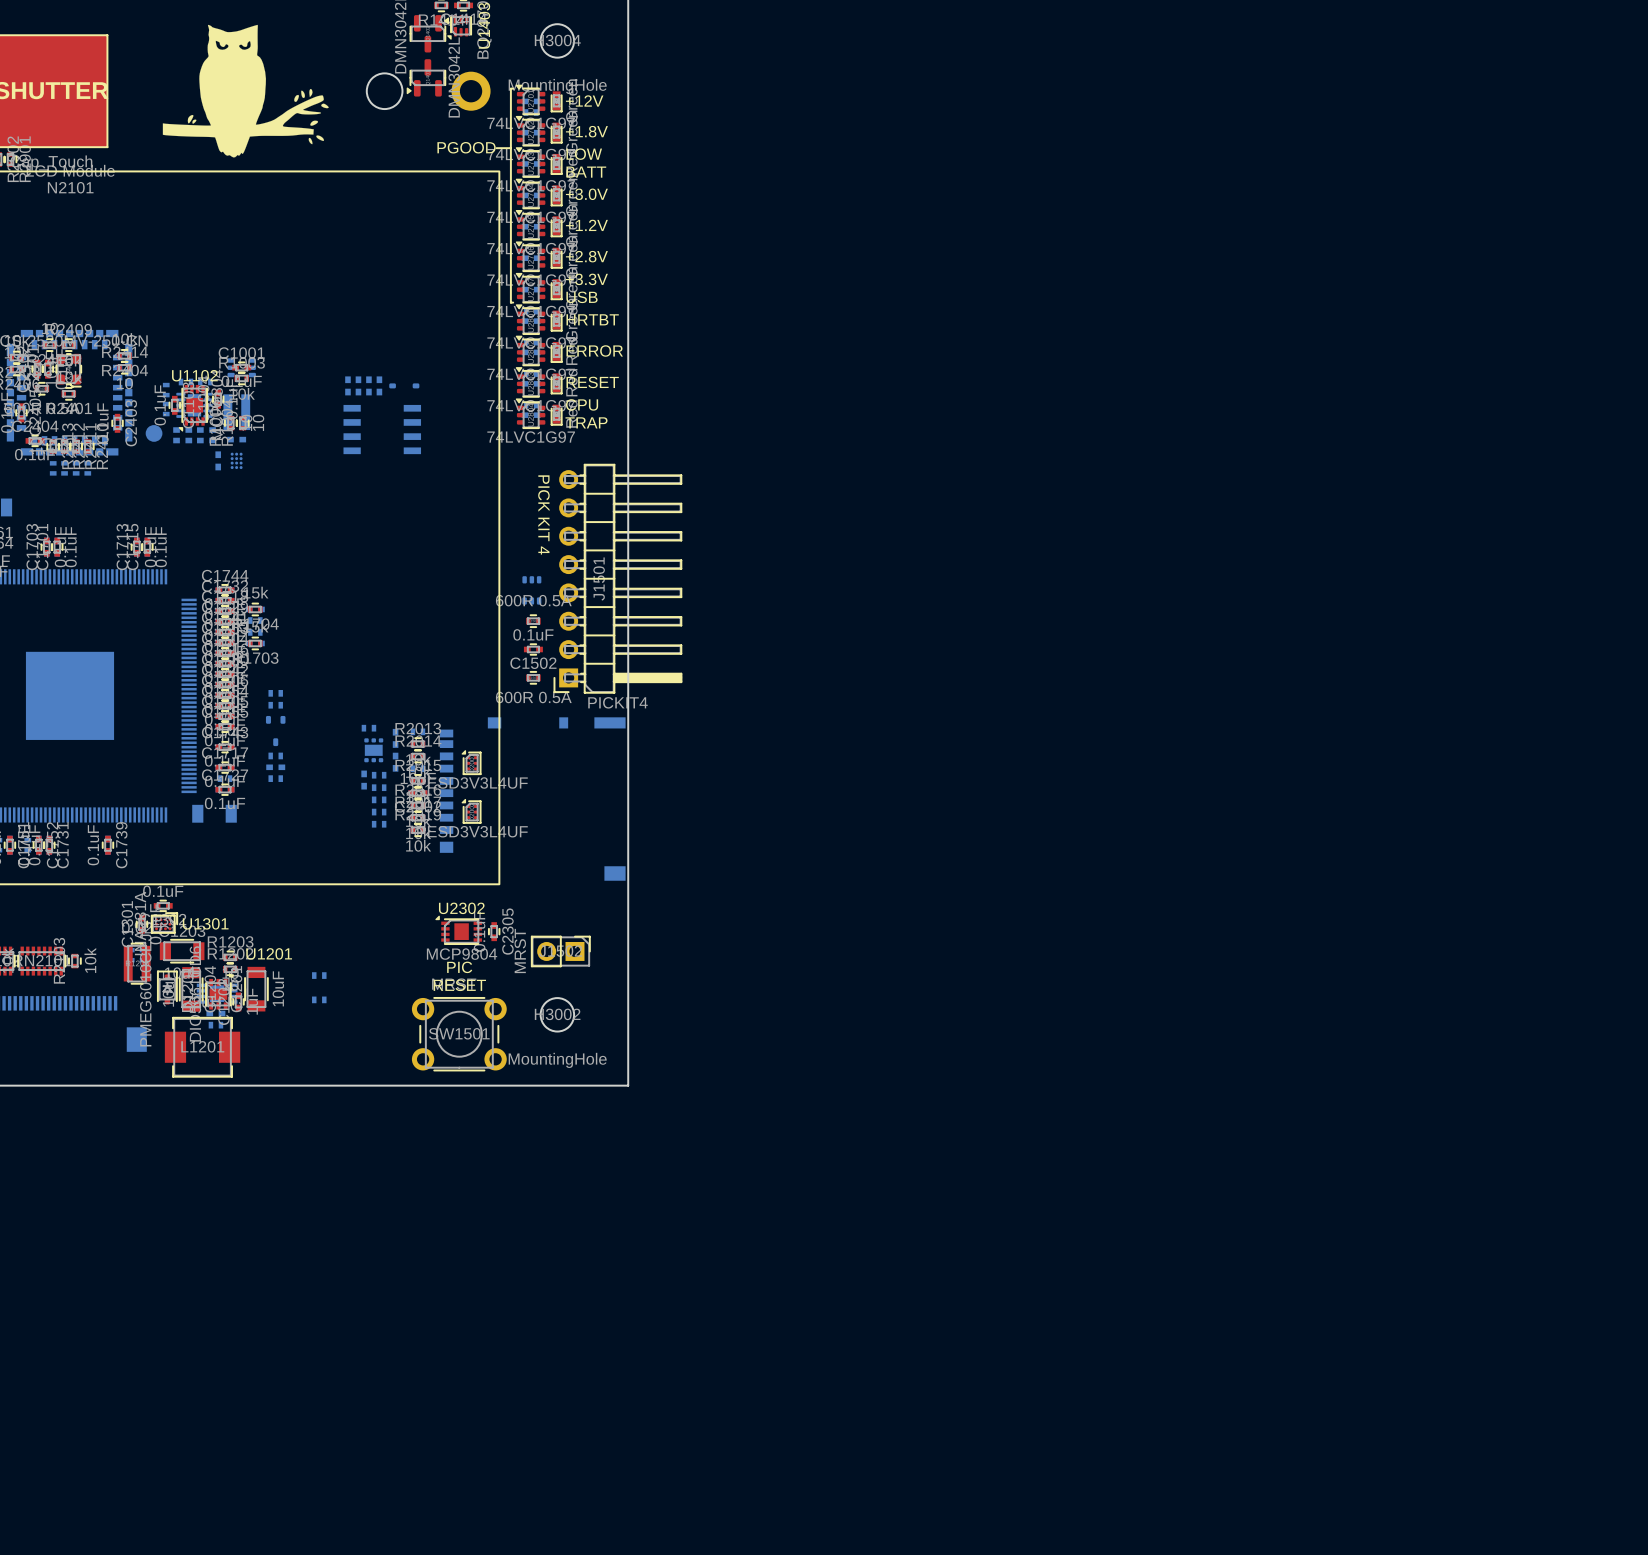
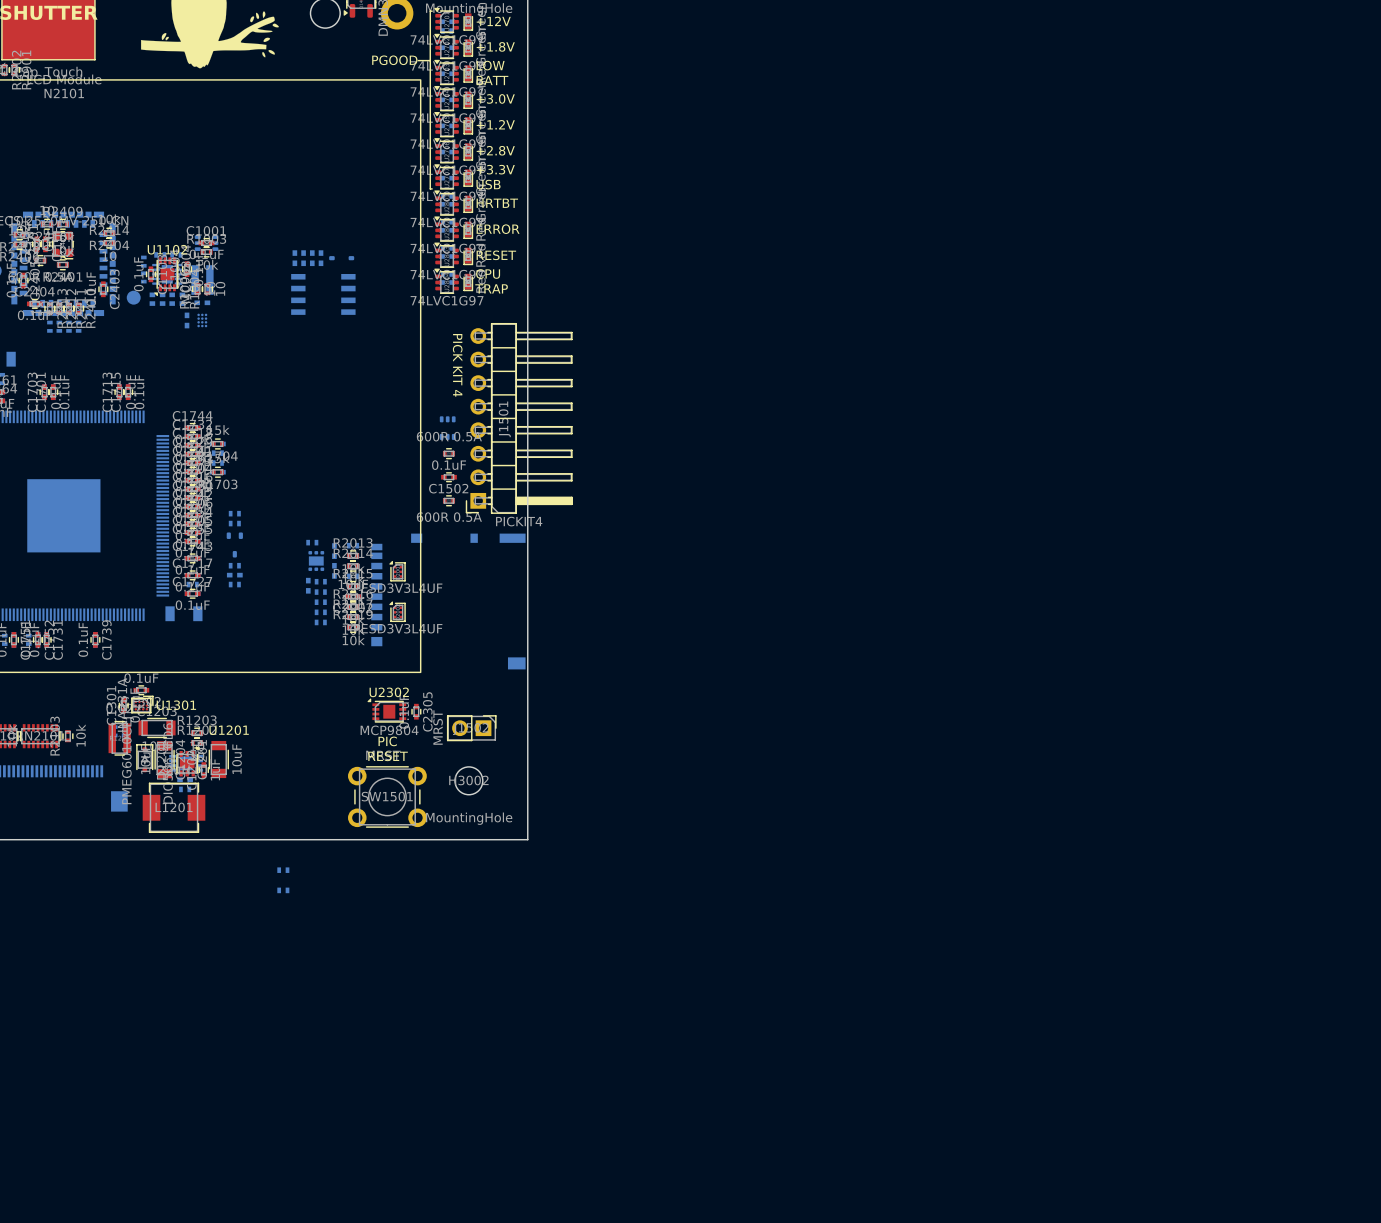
part: (319, 975) -> none
part: (319, 999) -> none
part: none -> (283, 870)
part: none -> (283, 890)

